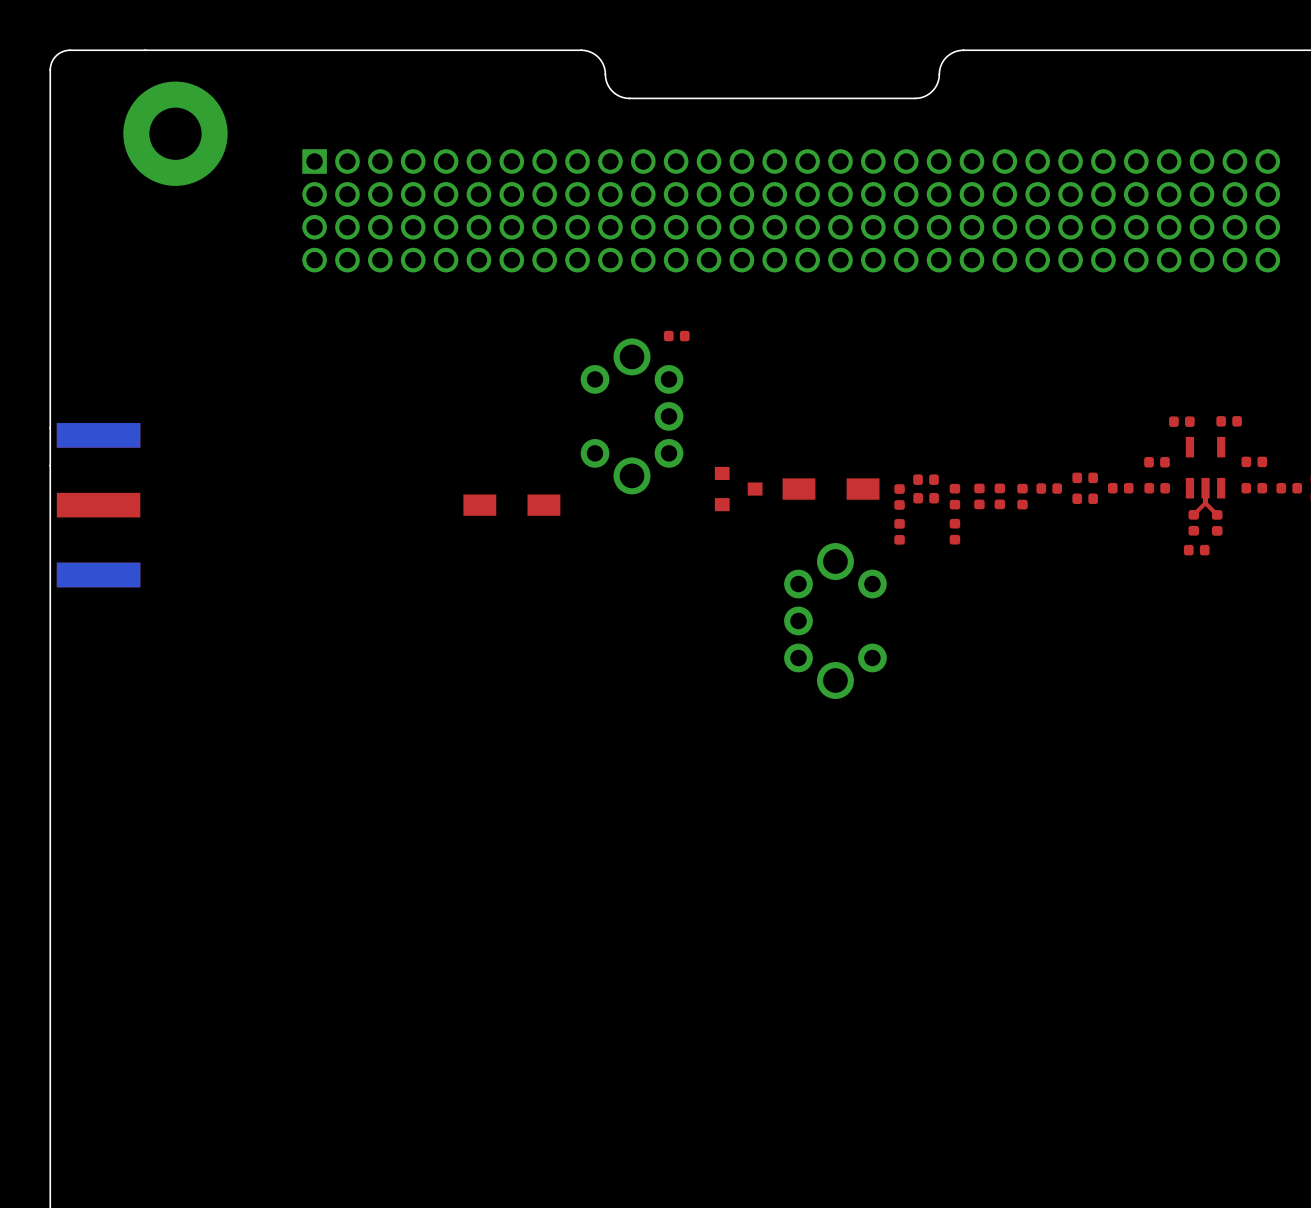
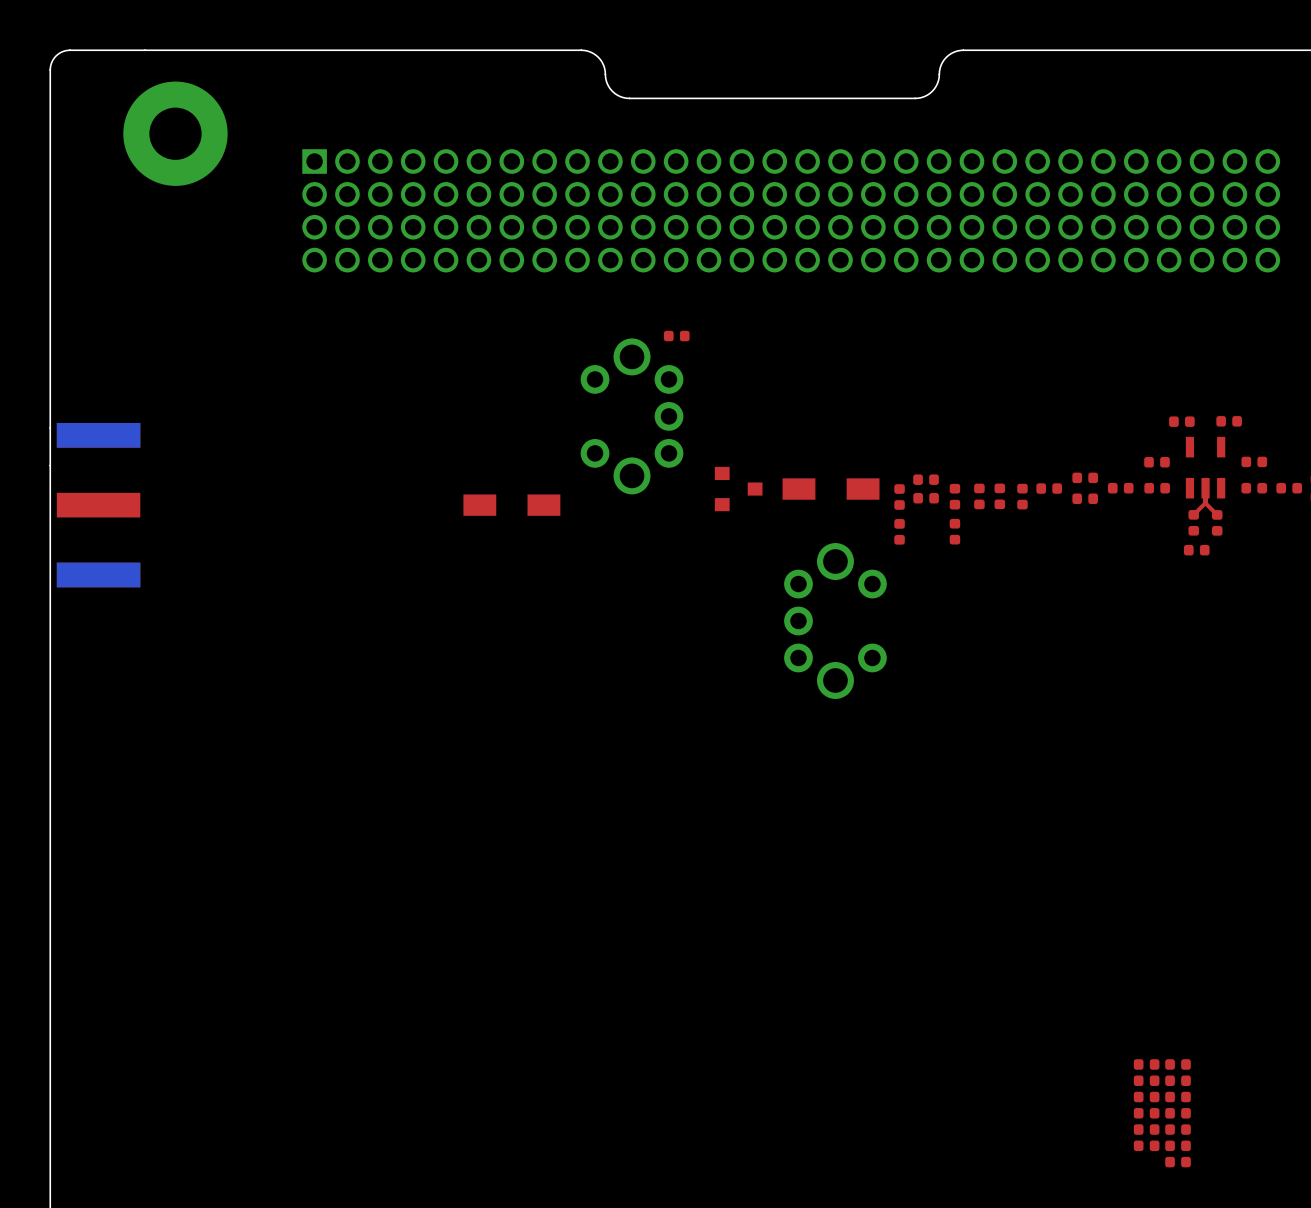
part: none -> (1146, 1064)
part: none -> (1178, 1064)
part: none -> (1146, 1080)
part: none -> (1178, 1080)
part: none -> (1146, 1097)
part: none -> (1178, 1097)
part: none -> (1146, 1113)
part: none -> (1178, 1113)
part: none -> (1146, 1129)
part: none -> (1178, 1129)
part: none -> (1146, 1145)
part: none -> (1178, 1145)
part: none -> (1178, 1162)

